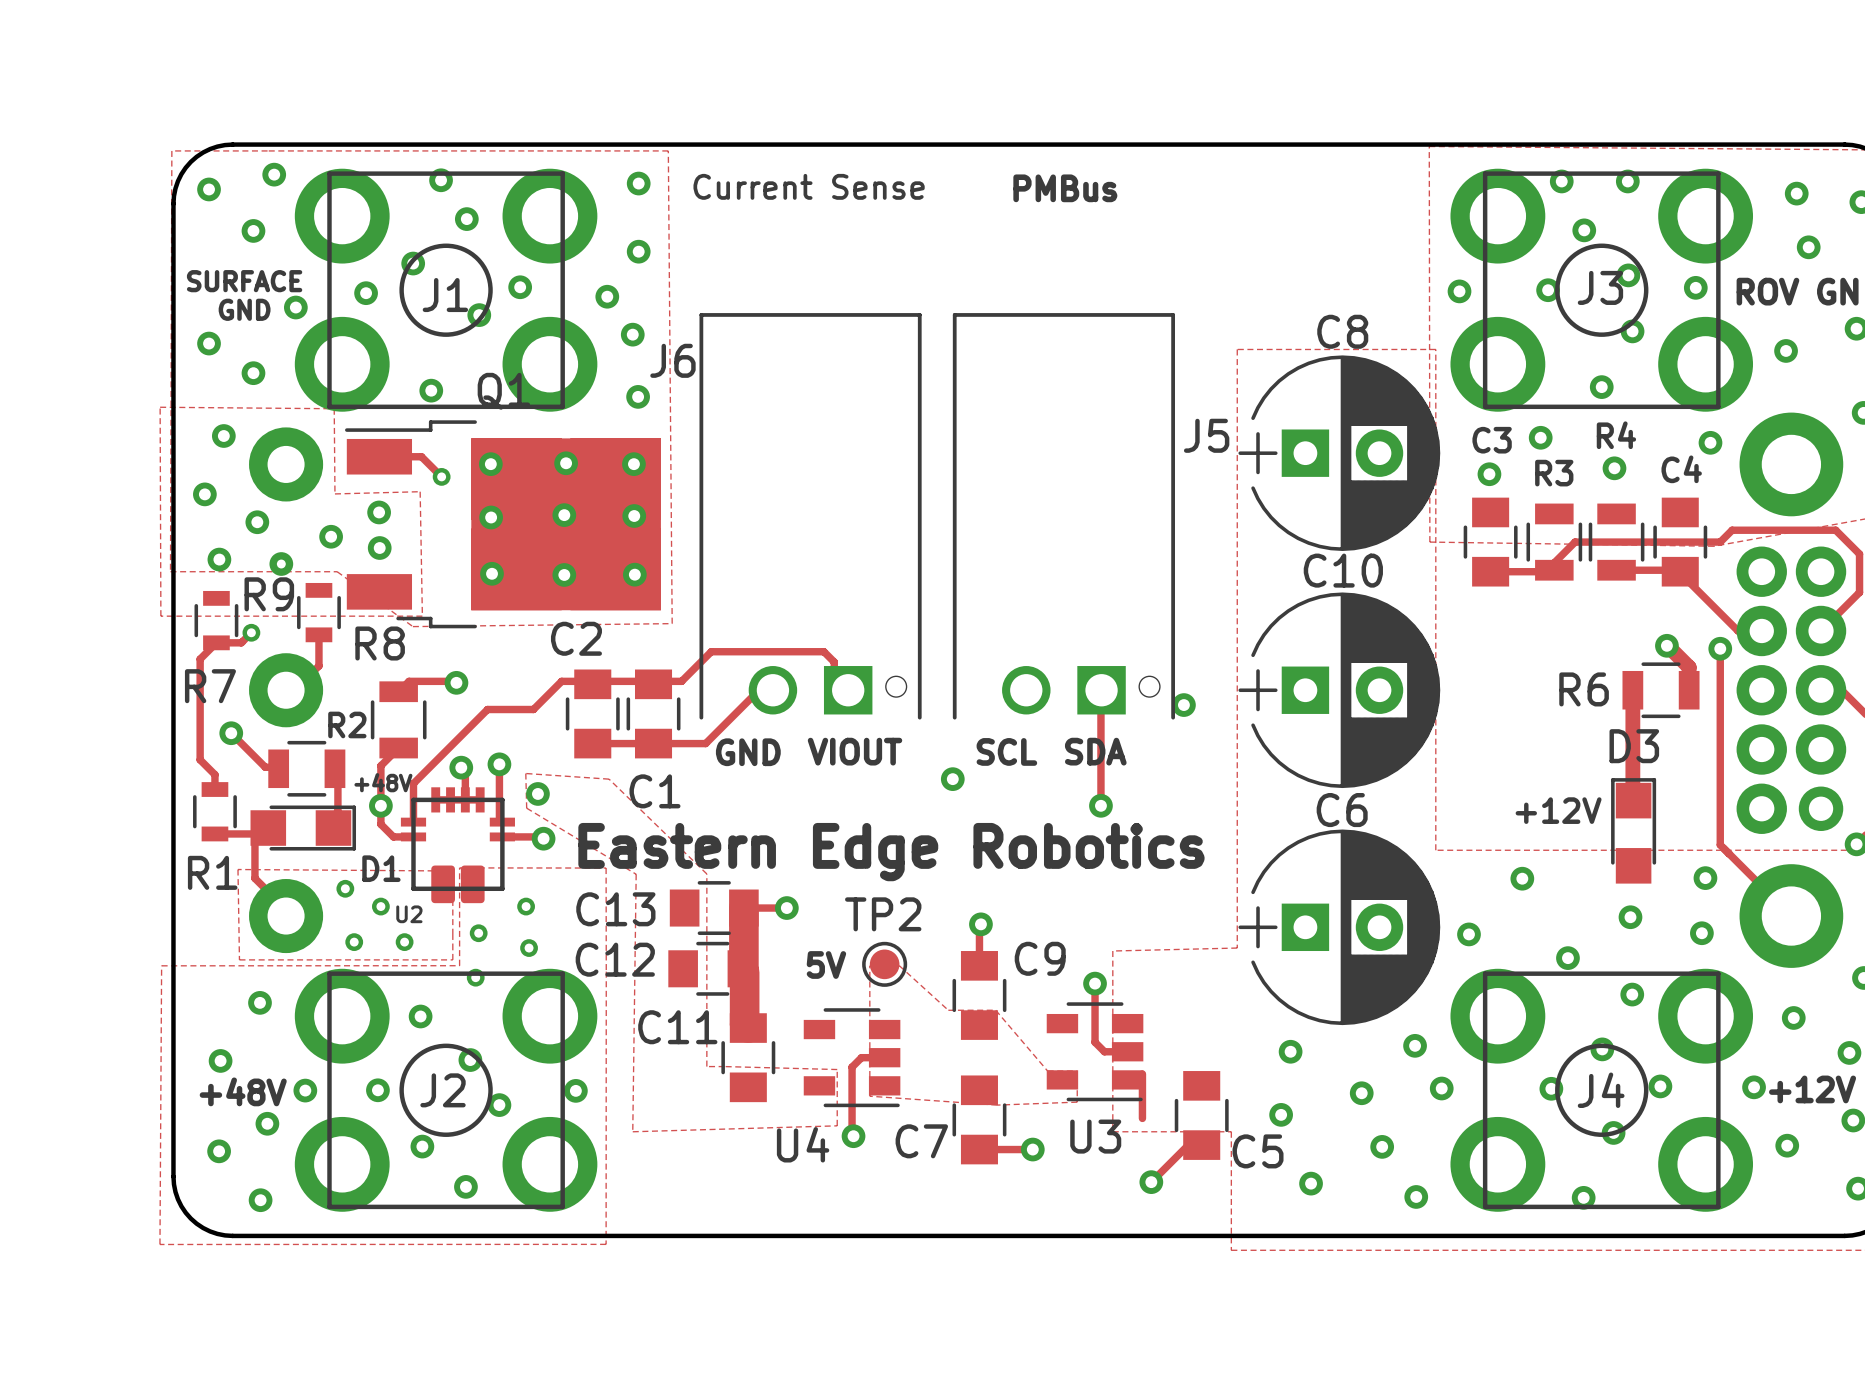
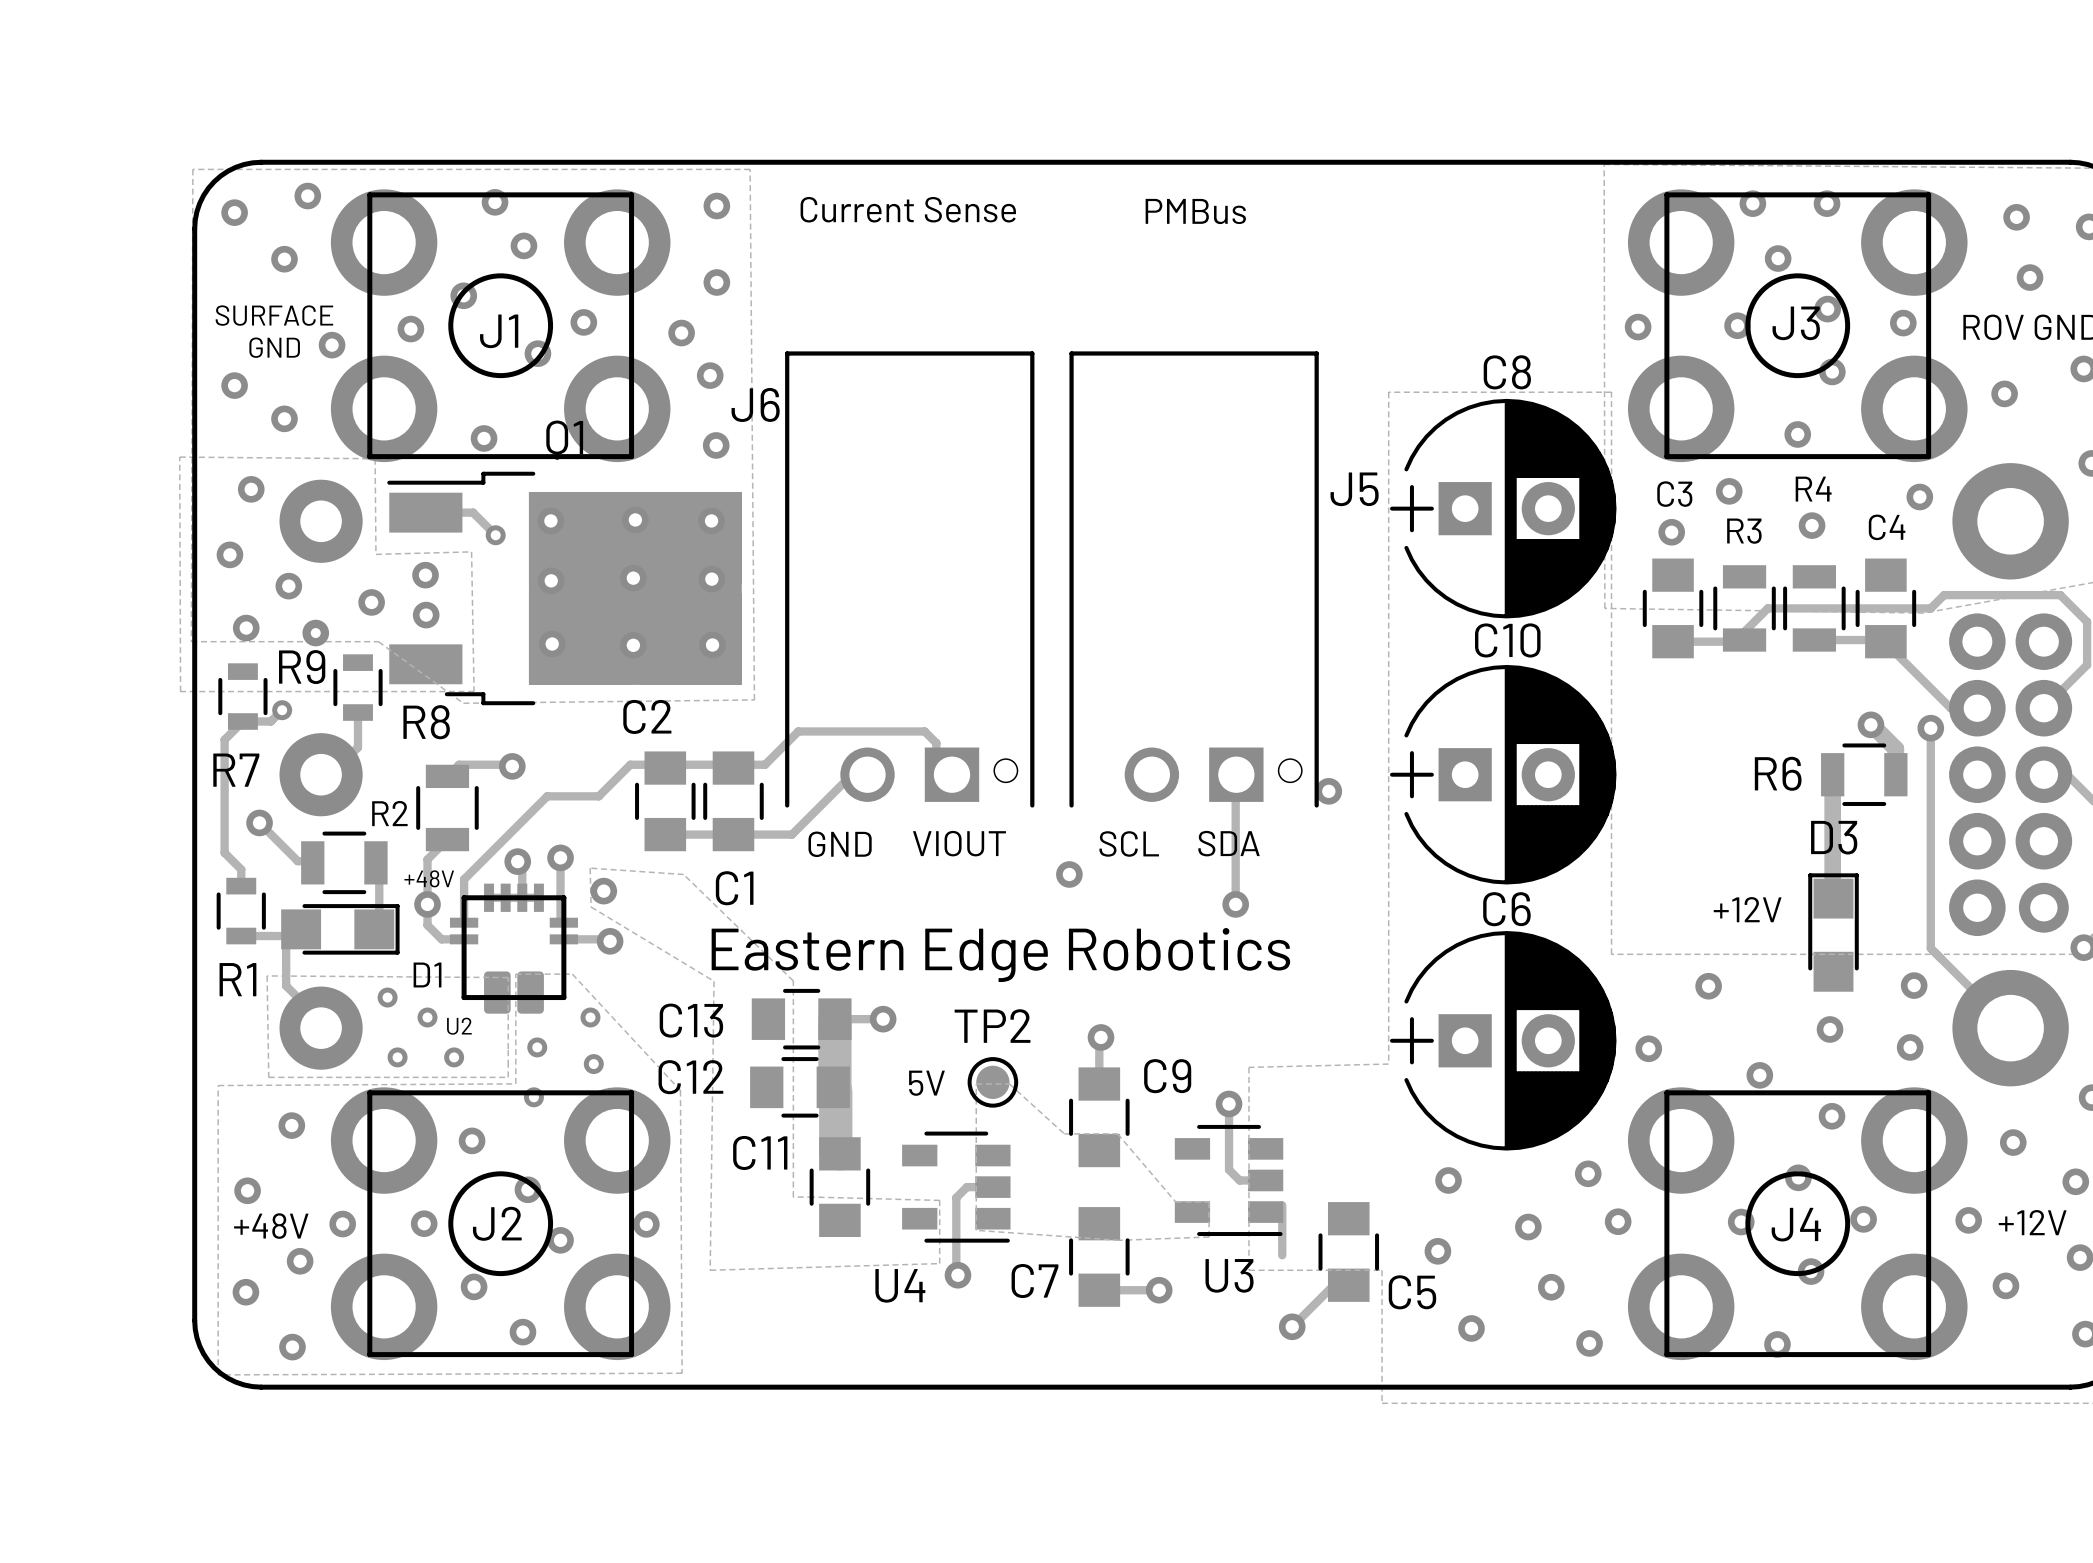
zone outline: (459, 867) (606, 868) (606, 1244) (159, 1244) (161, 965) (459, 965) -> (515, 974) (572, 974) (680, 1090) (682, 1373) (218, 1374) (218, 1085) (515, 1083)

